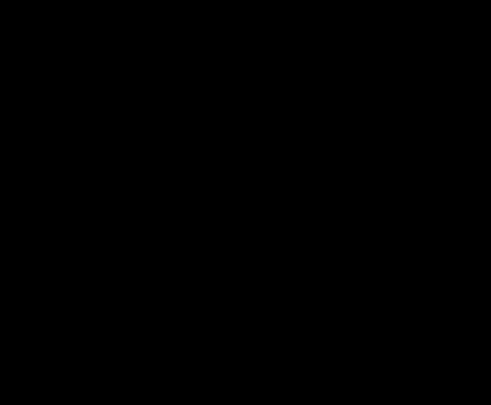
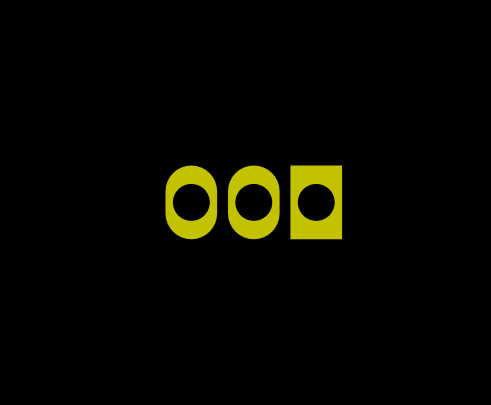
part: none -> (253, 202)

